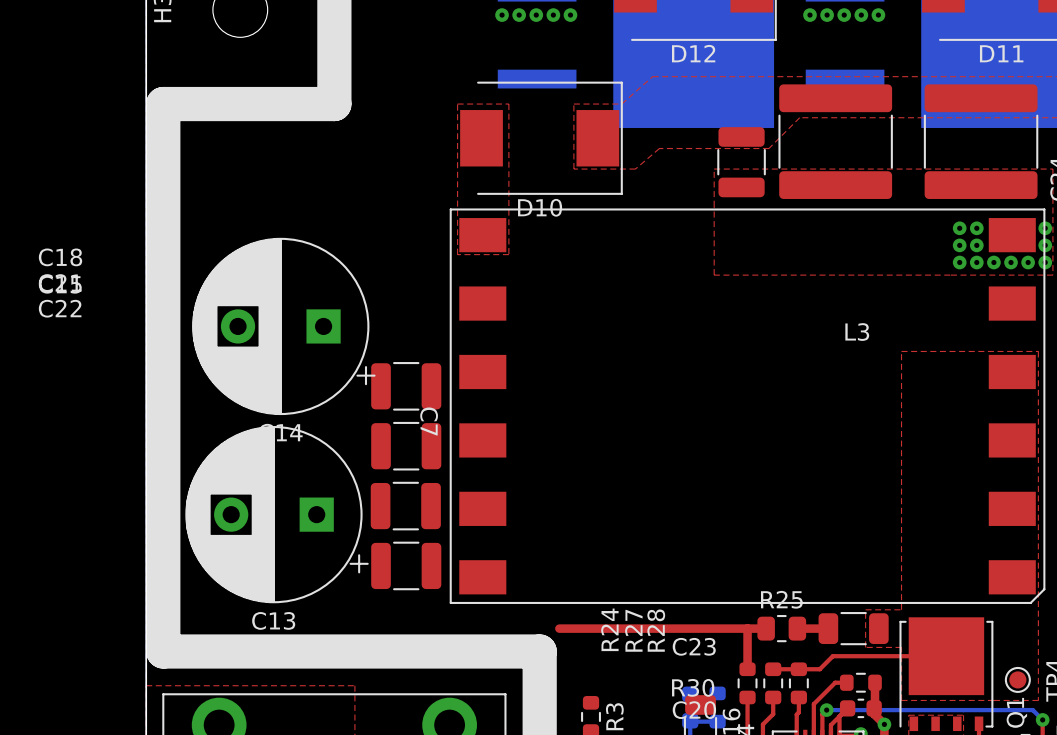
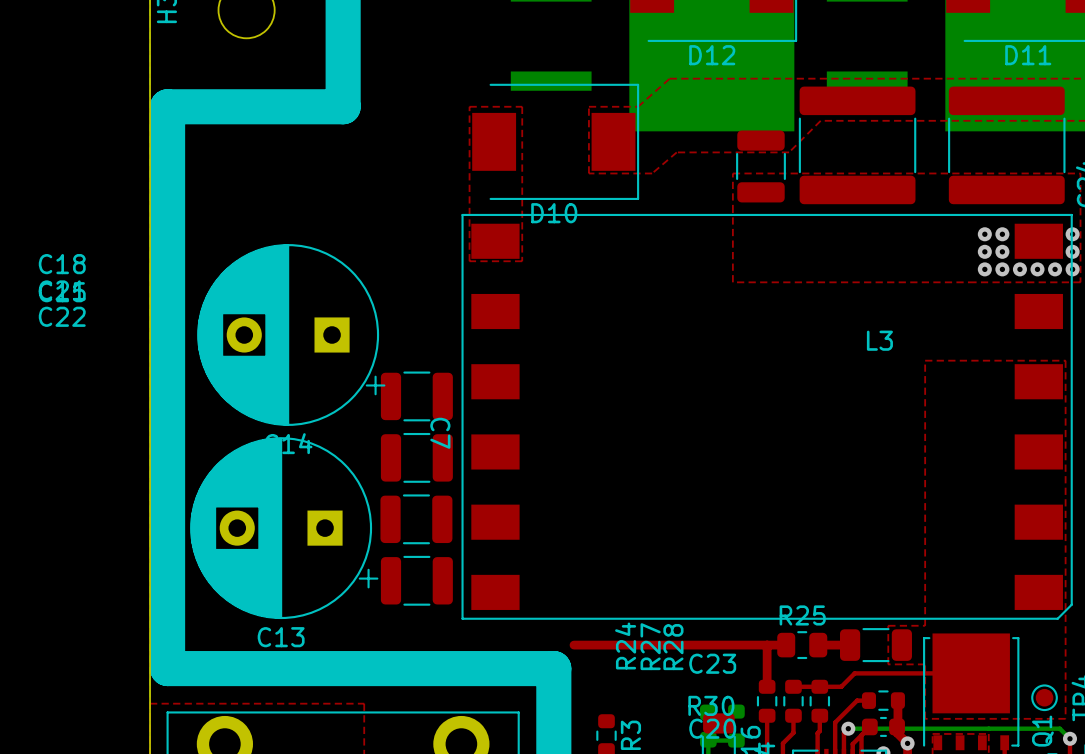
via: (502, 15) -> none
via: (519, 15) -> none
via: (536, 15) -> none
via: (553, 15) -> none
via: (570, 15) -> none
via: (809, 15) -> none
via: (827, 15) -> none
via: (844, 15) -> none
via: (861, 15) -> none
via: (878, 15) -> none

